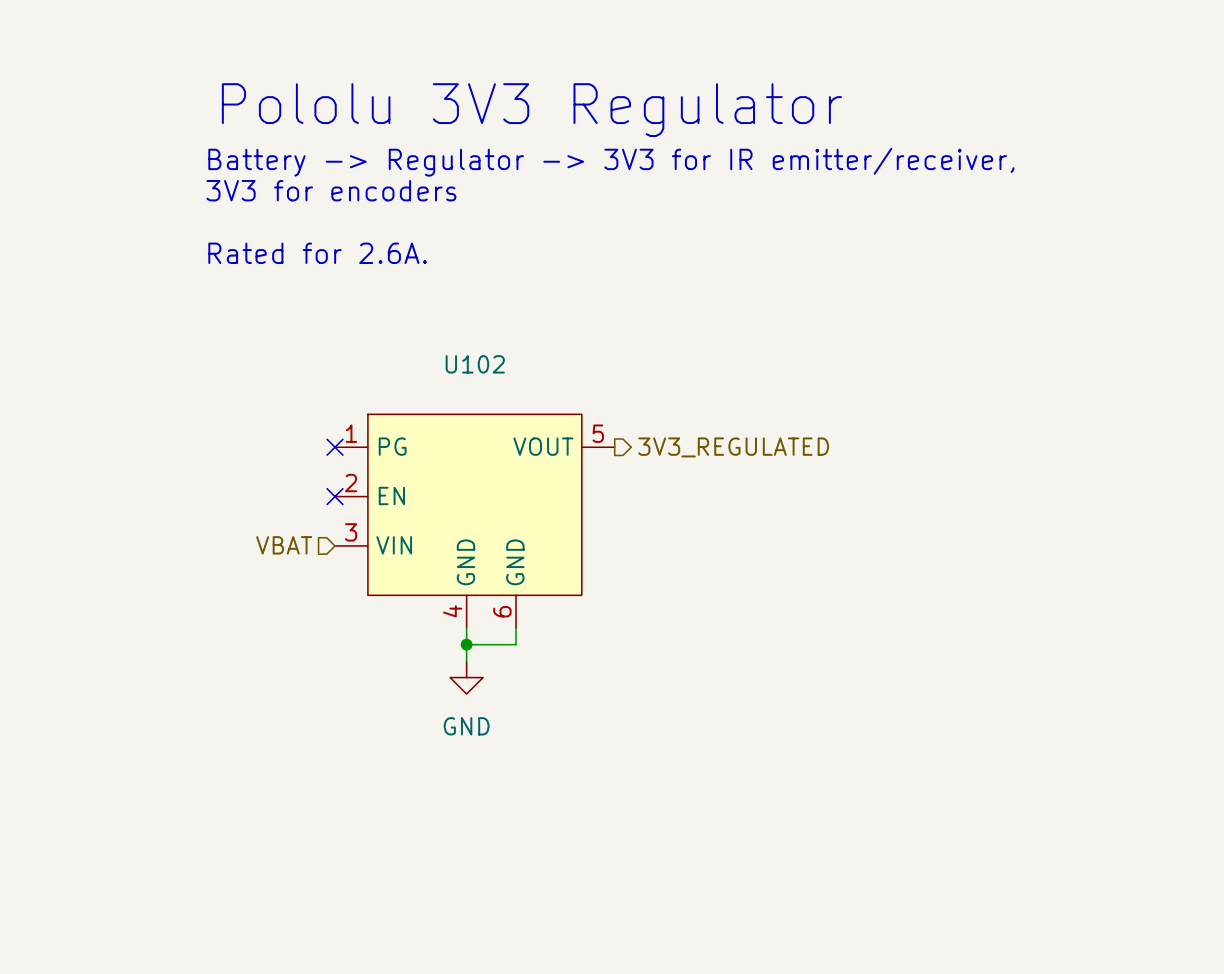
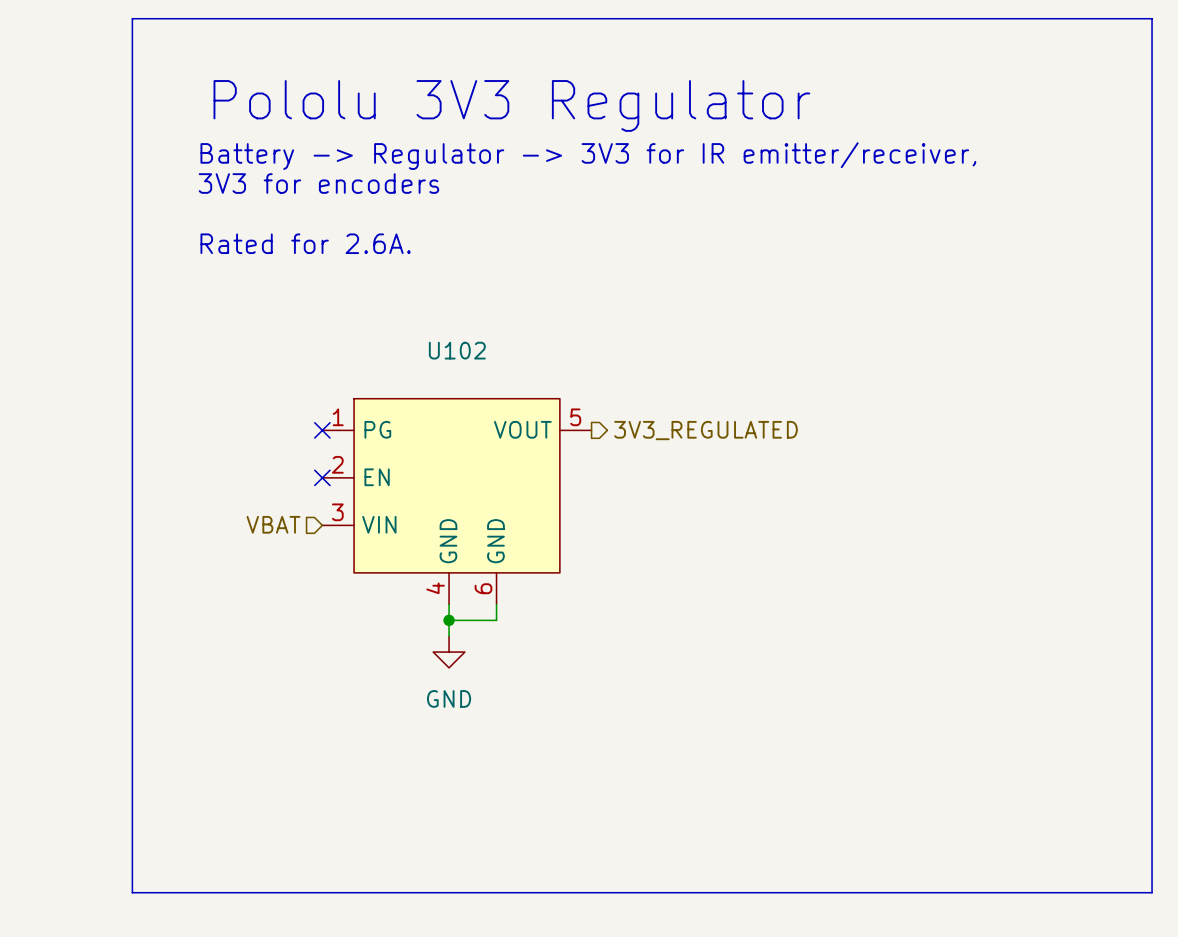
line: none -> (132, 18) (1152, 18) (1152, 892) (132, 892) (132, 18)

